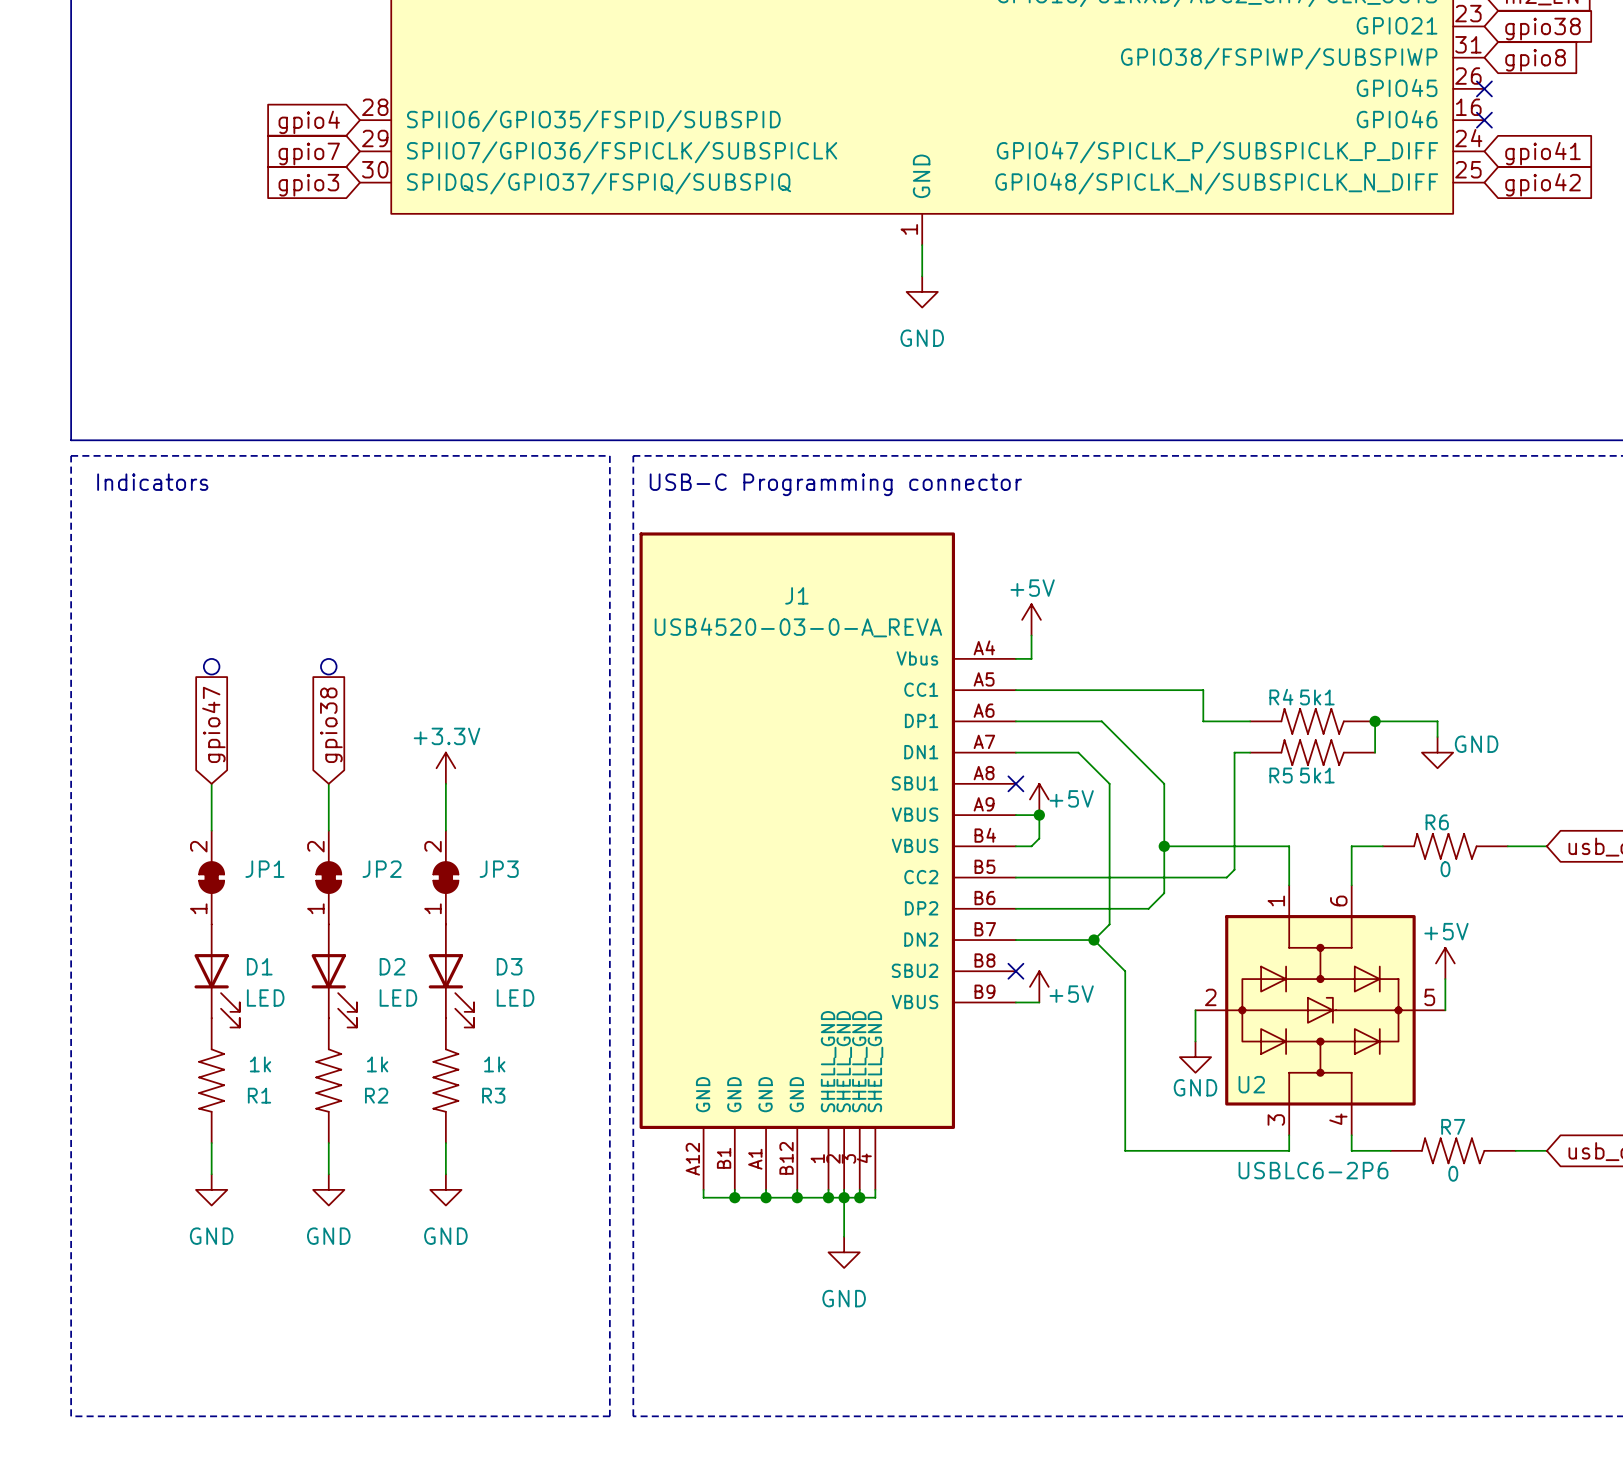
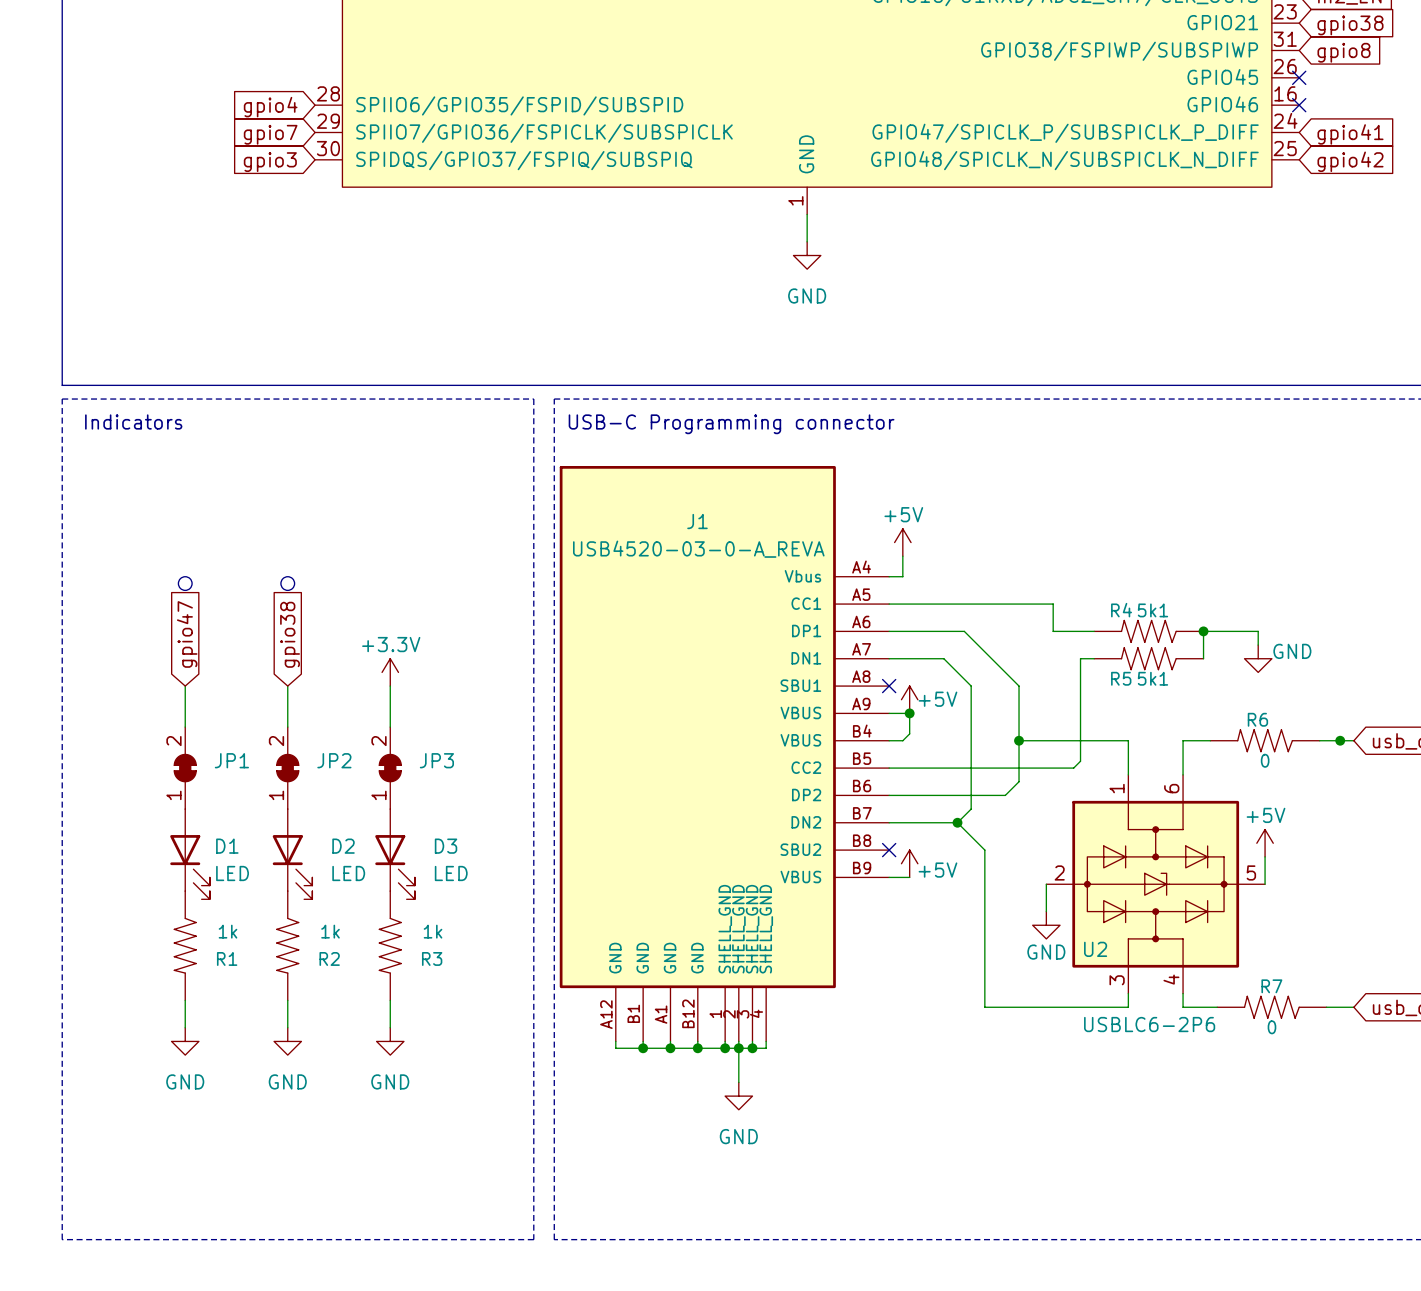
junction: none -> (1340, 740)

